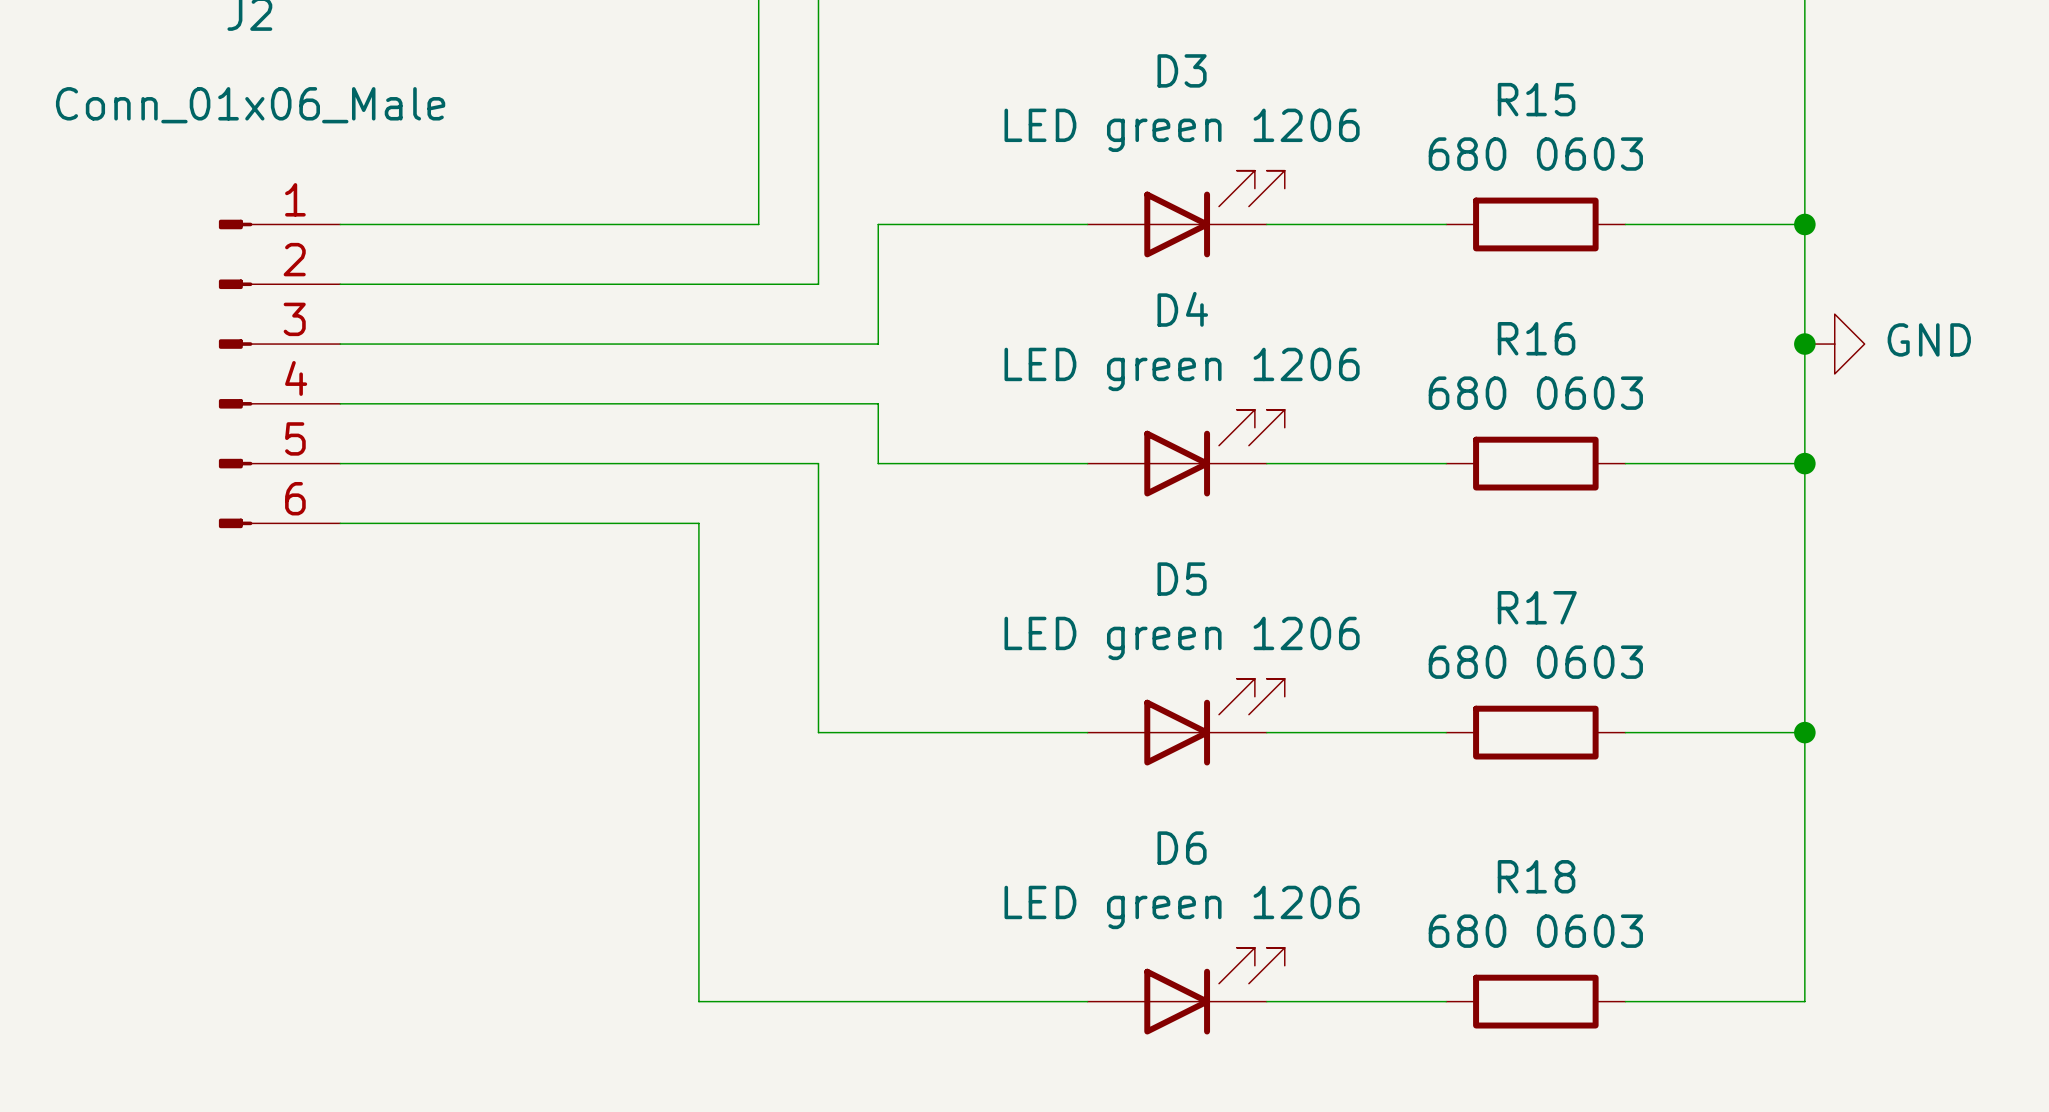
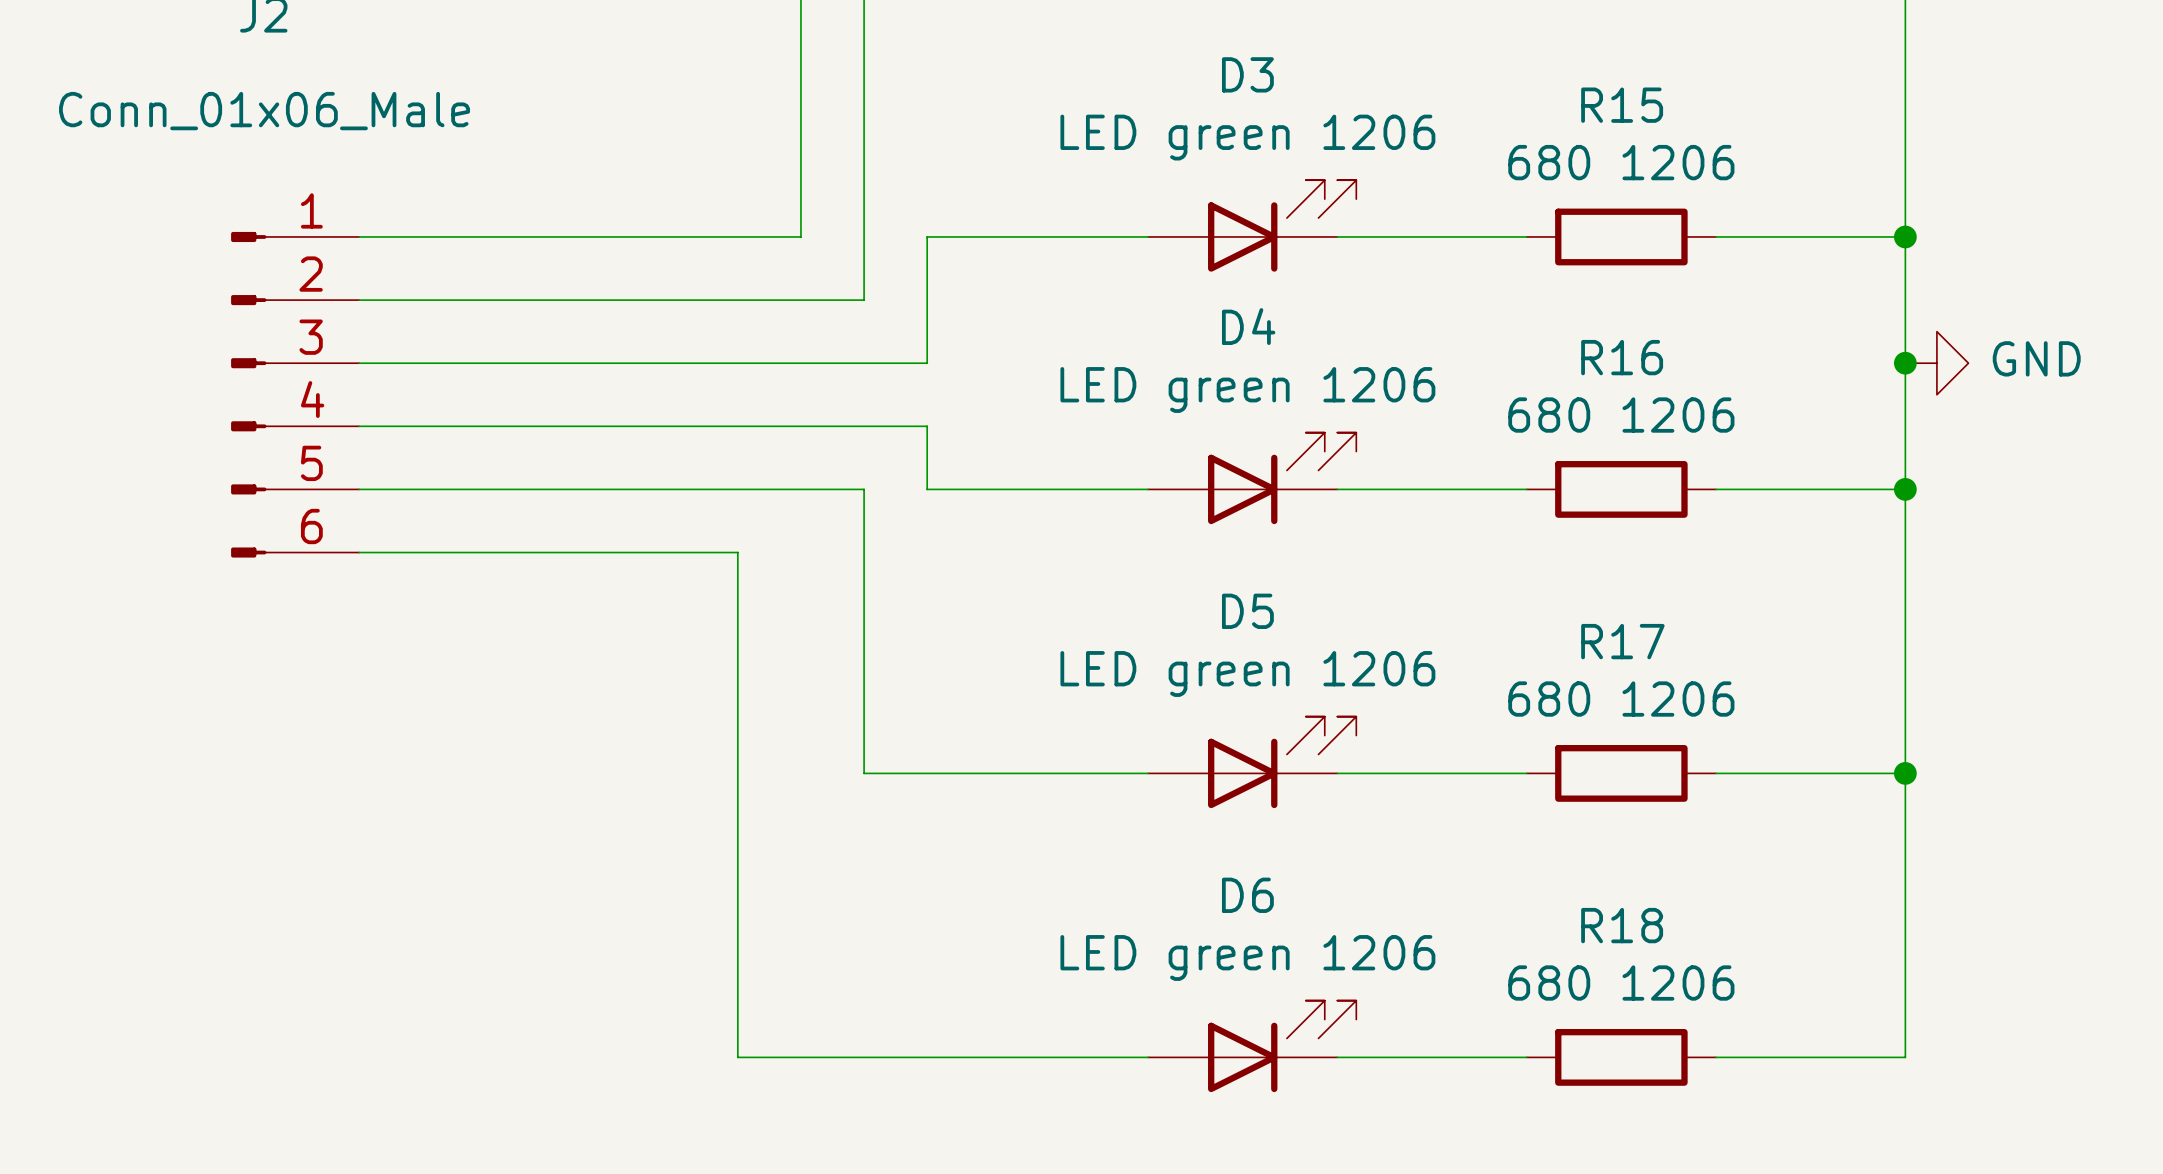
R15 value: 680 0603 (1535, 154) -> 680 1206 (1621, 162)
R16 value: 680 0603 (1535, 393) -> 680 1206 (1621, 415)
R17 value: 680 0603 (1535, 662) -> 680 1206 (1621, 699)
R18 value: 680 0603 (1535, 931) -> 680 1206 (1621, 983)

